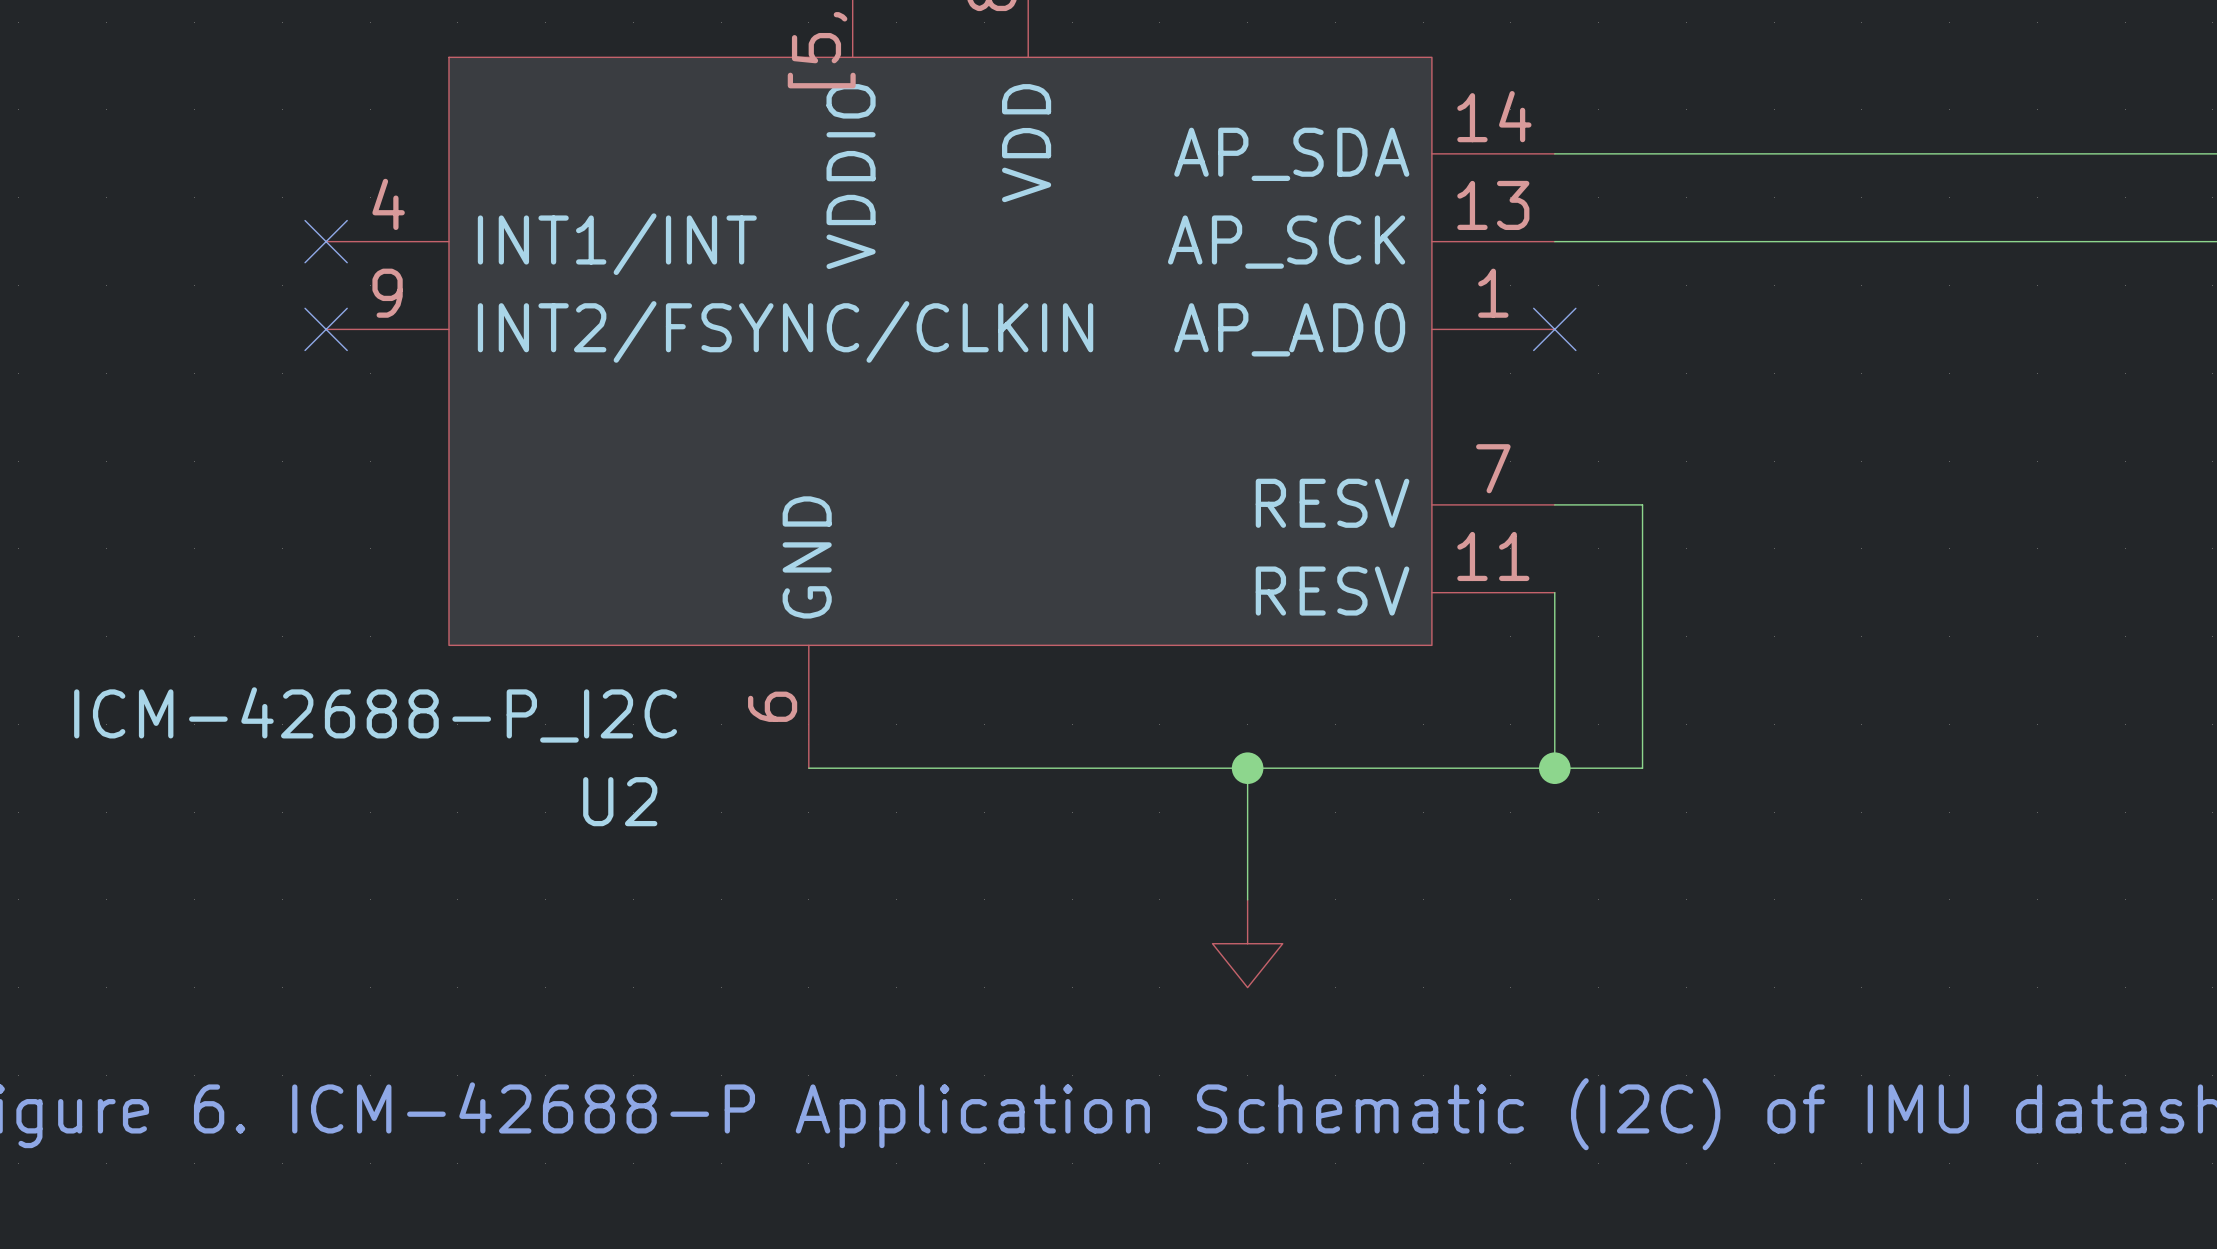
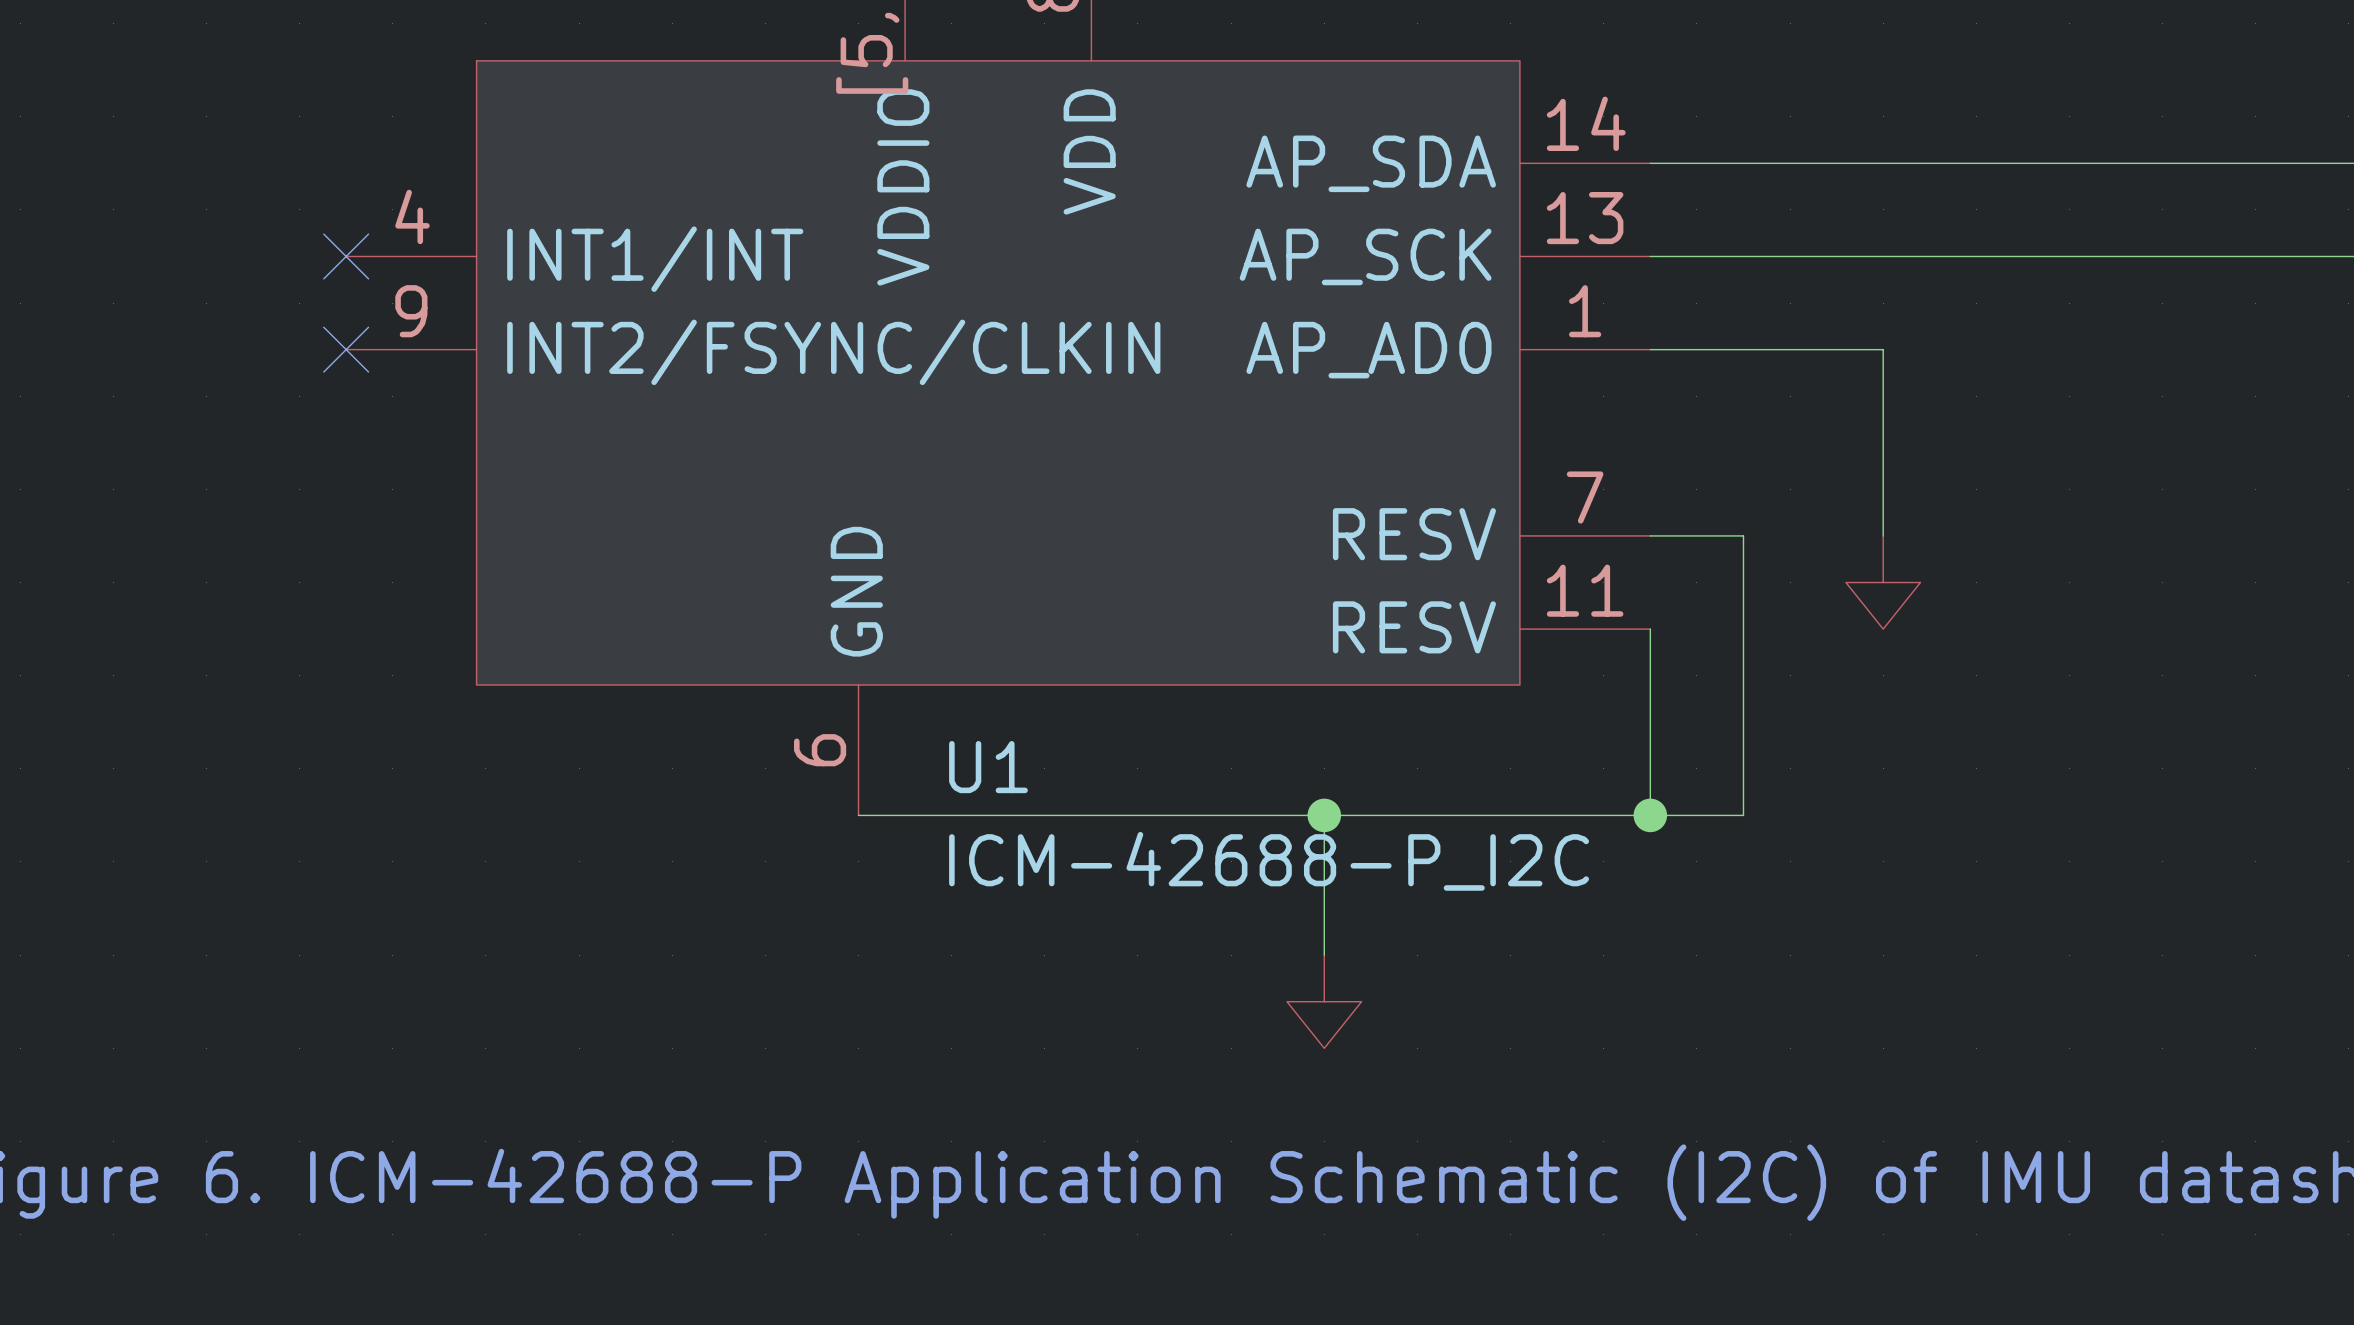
wire: none -> (1650, 349) (1883, 349) (1883, 535)
no-connect mark: (1554, 329) -> none
power symbol: none -> (1883, 582)
U2 value position: ICM-42688-P_I2C (375, 714) -> ICM-42688-P_I2C (1269, 861)
U2 name: U2 (620, 801) -> U1 (988, 767)

